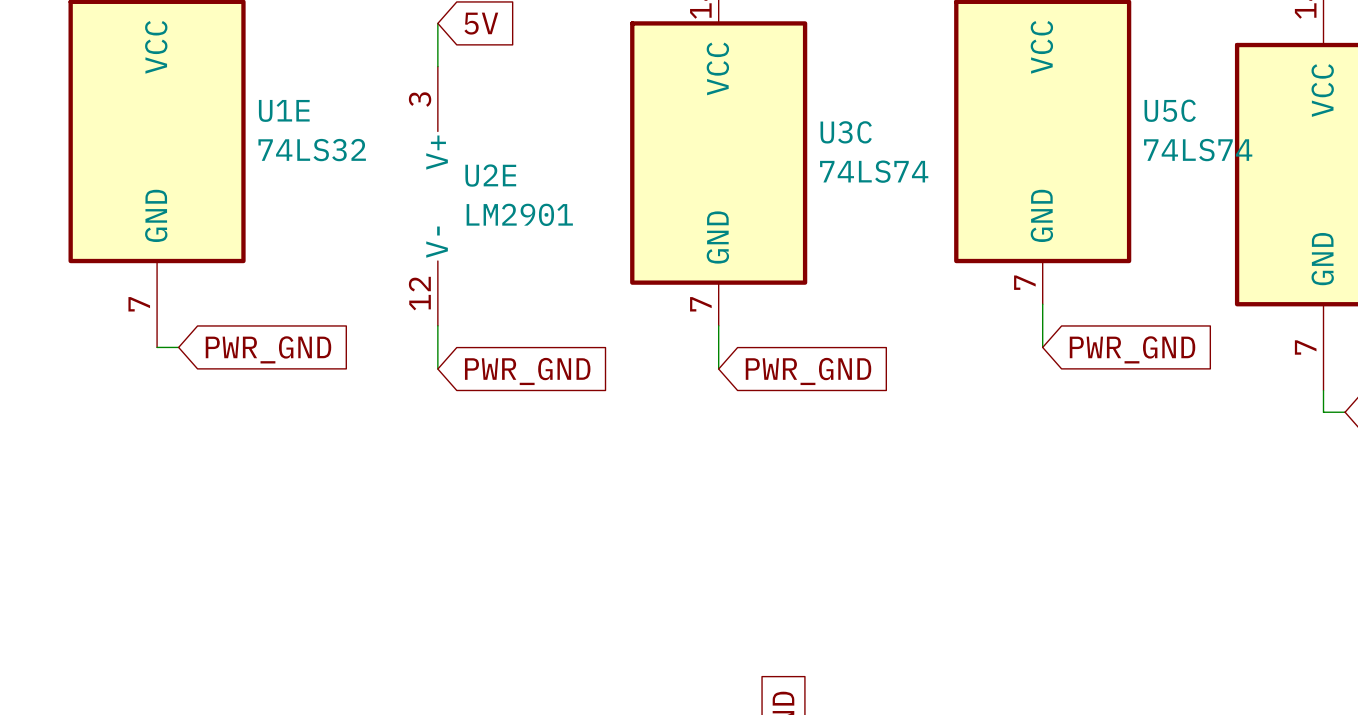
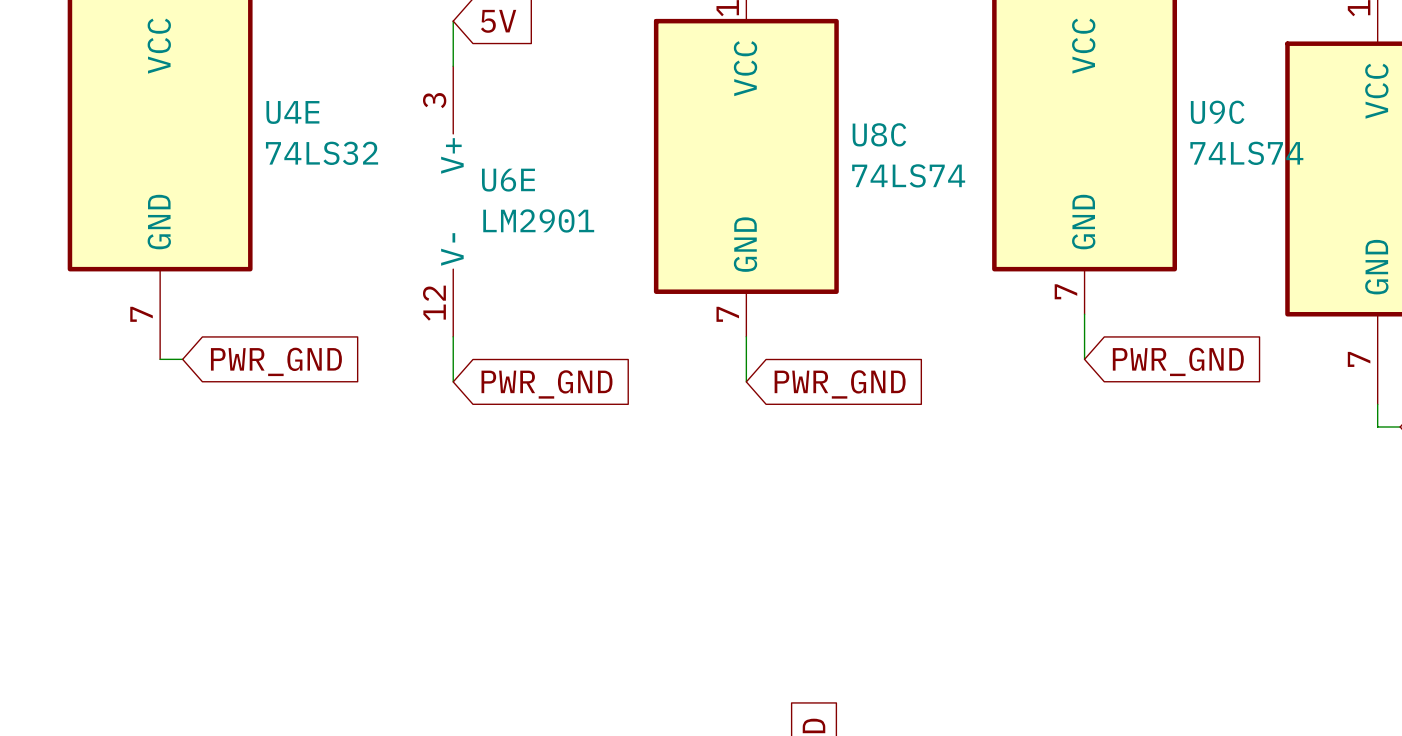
U1E name: U1E (284, 110) -> U4E (292, 112)
U5C name: U5C (1170, 110) -> U9C (1217, 112)
U3C name: U3C (846, 132) -> U8C (879, 134)
U2E name: U2E (490, 175) -> U6E (508, 180)

